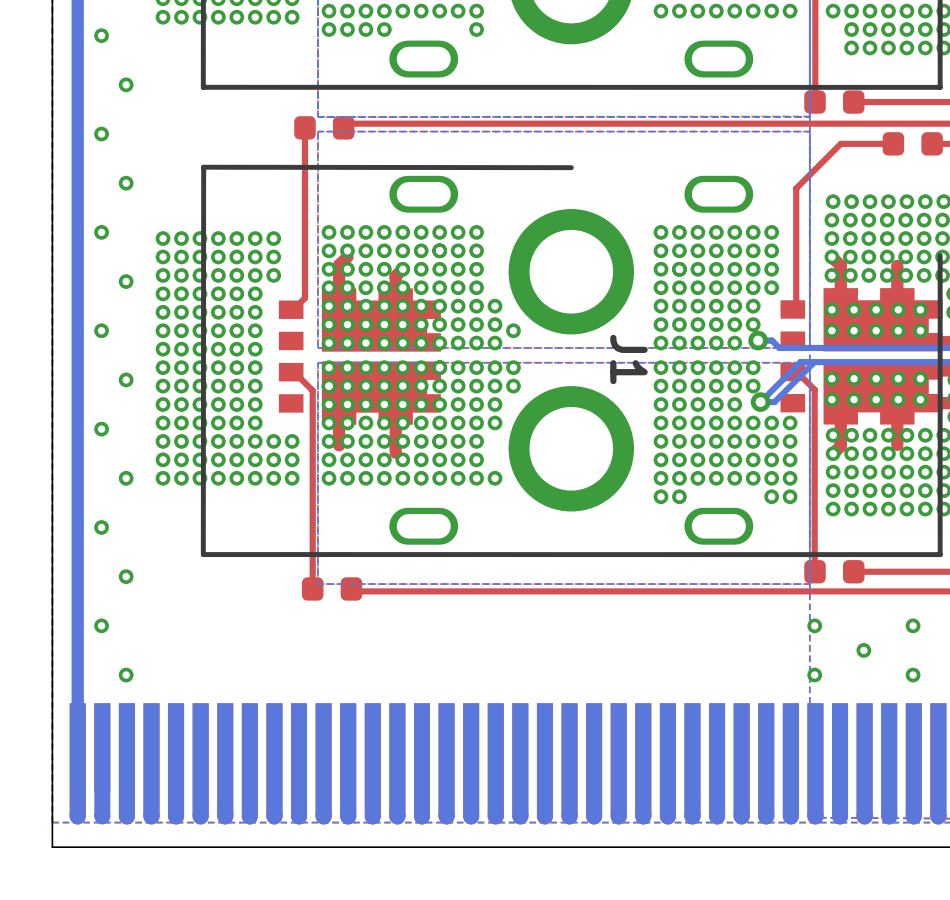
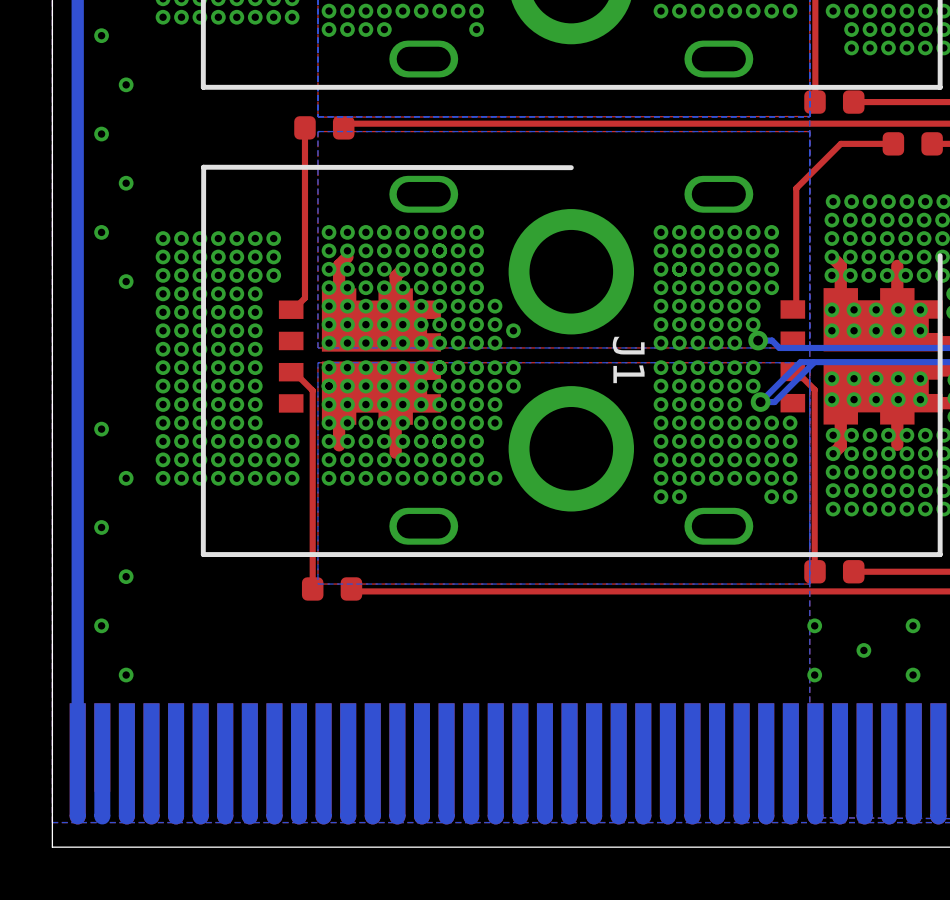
via: (101, 330) -> none
via: (126, 379) -> none

